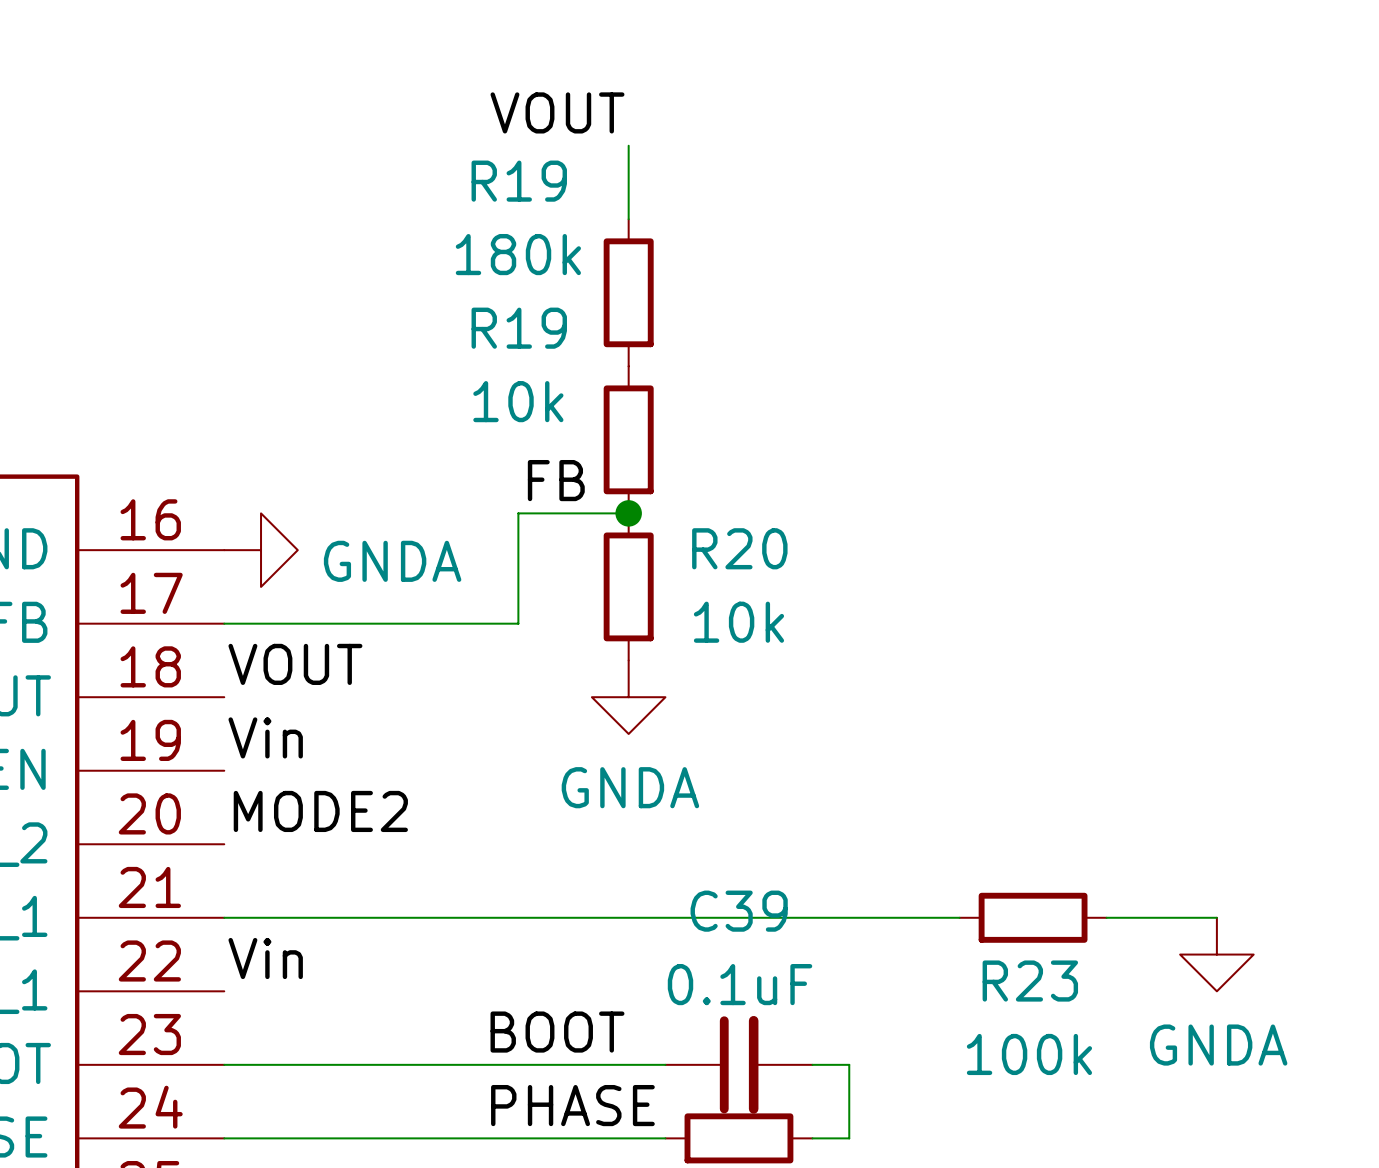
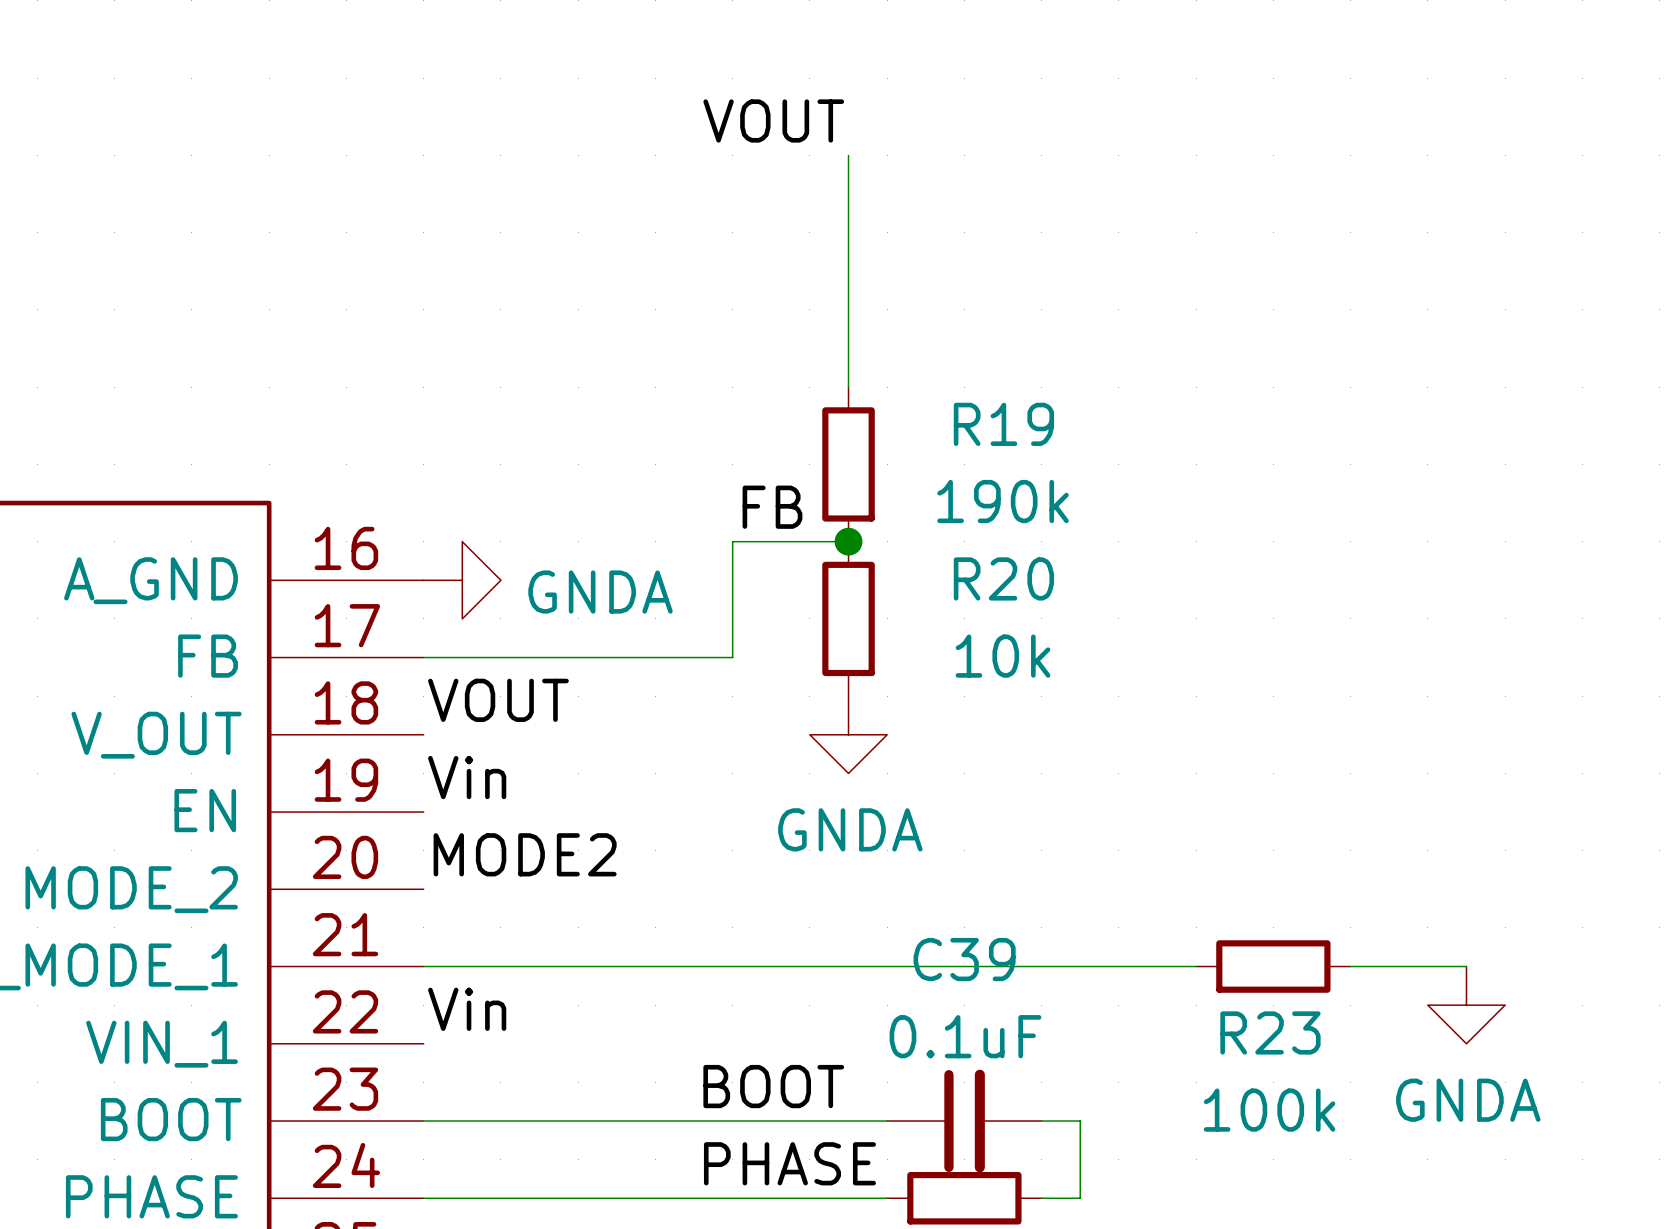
wire: none -> (848, 232) (848, 387)
R19: 180k (628, 292) -> none
R19 name position: R19 (519, 328) -> R19 (1003, 424)
R19 value: 10k (518, 401) -> 190k (1003, 501)
R20 name position: R20 (739, 548) -> R20 (1003, 578)
R20 value position: 10k (738, 622) -> 10k (1003, 656)

